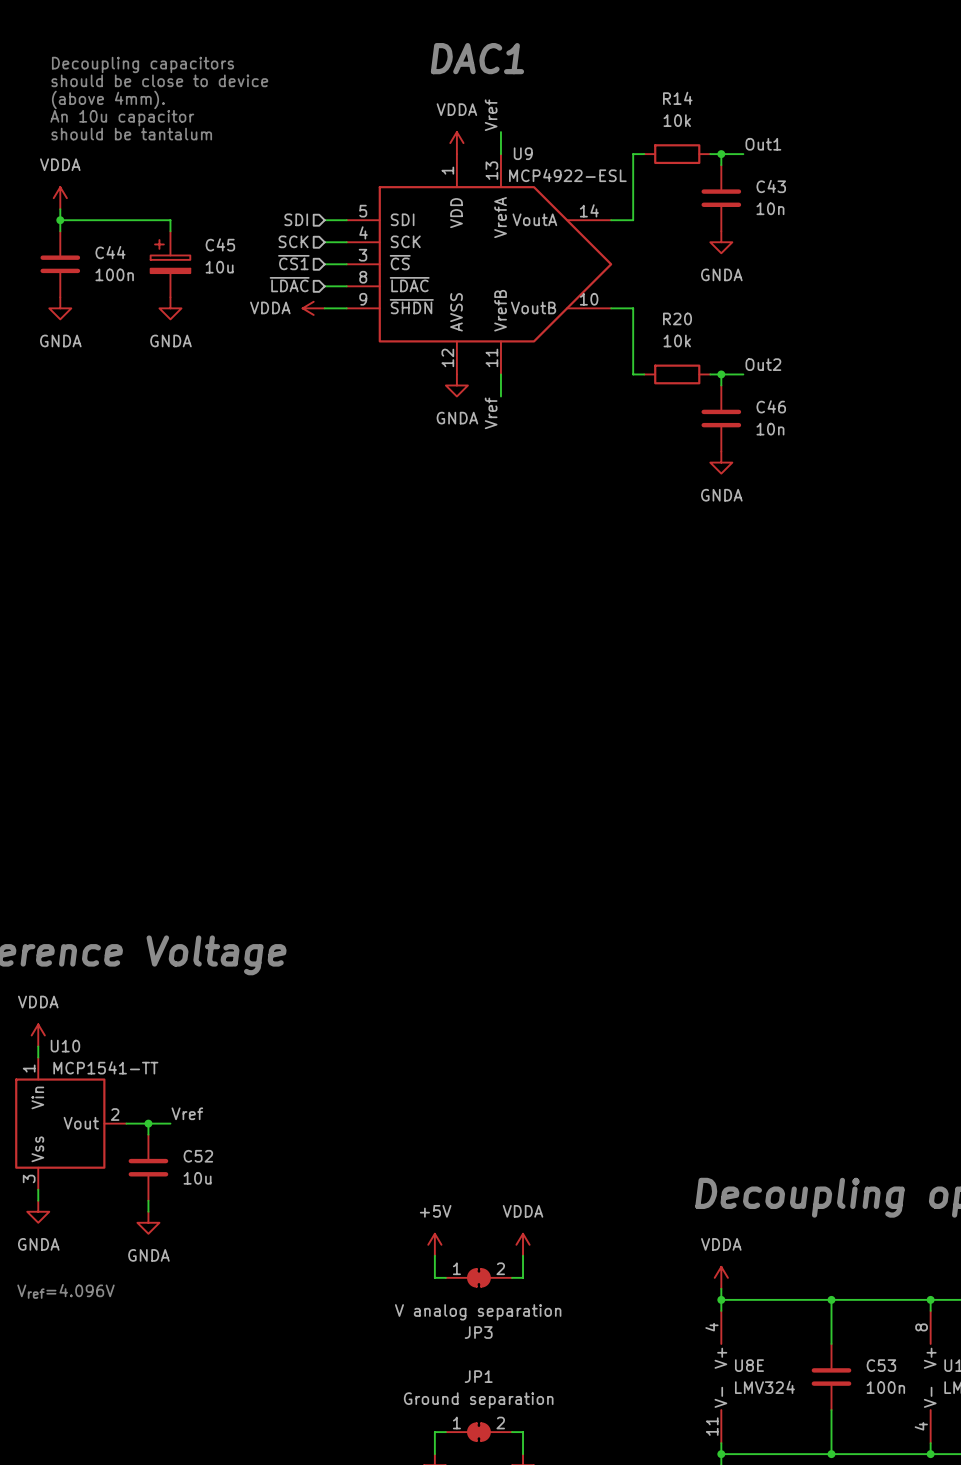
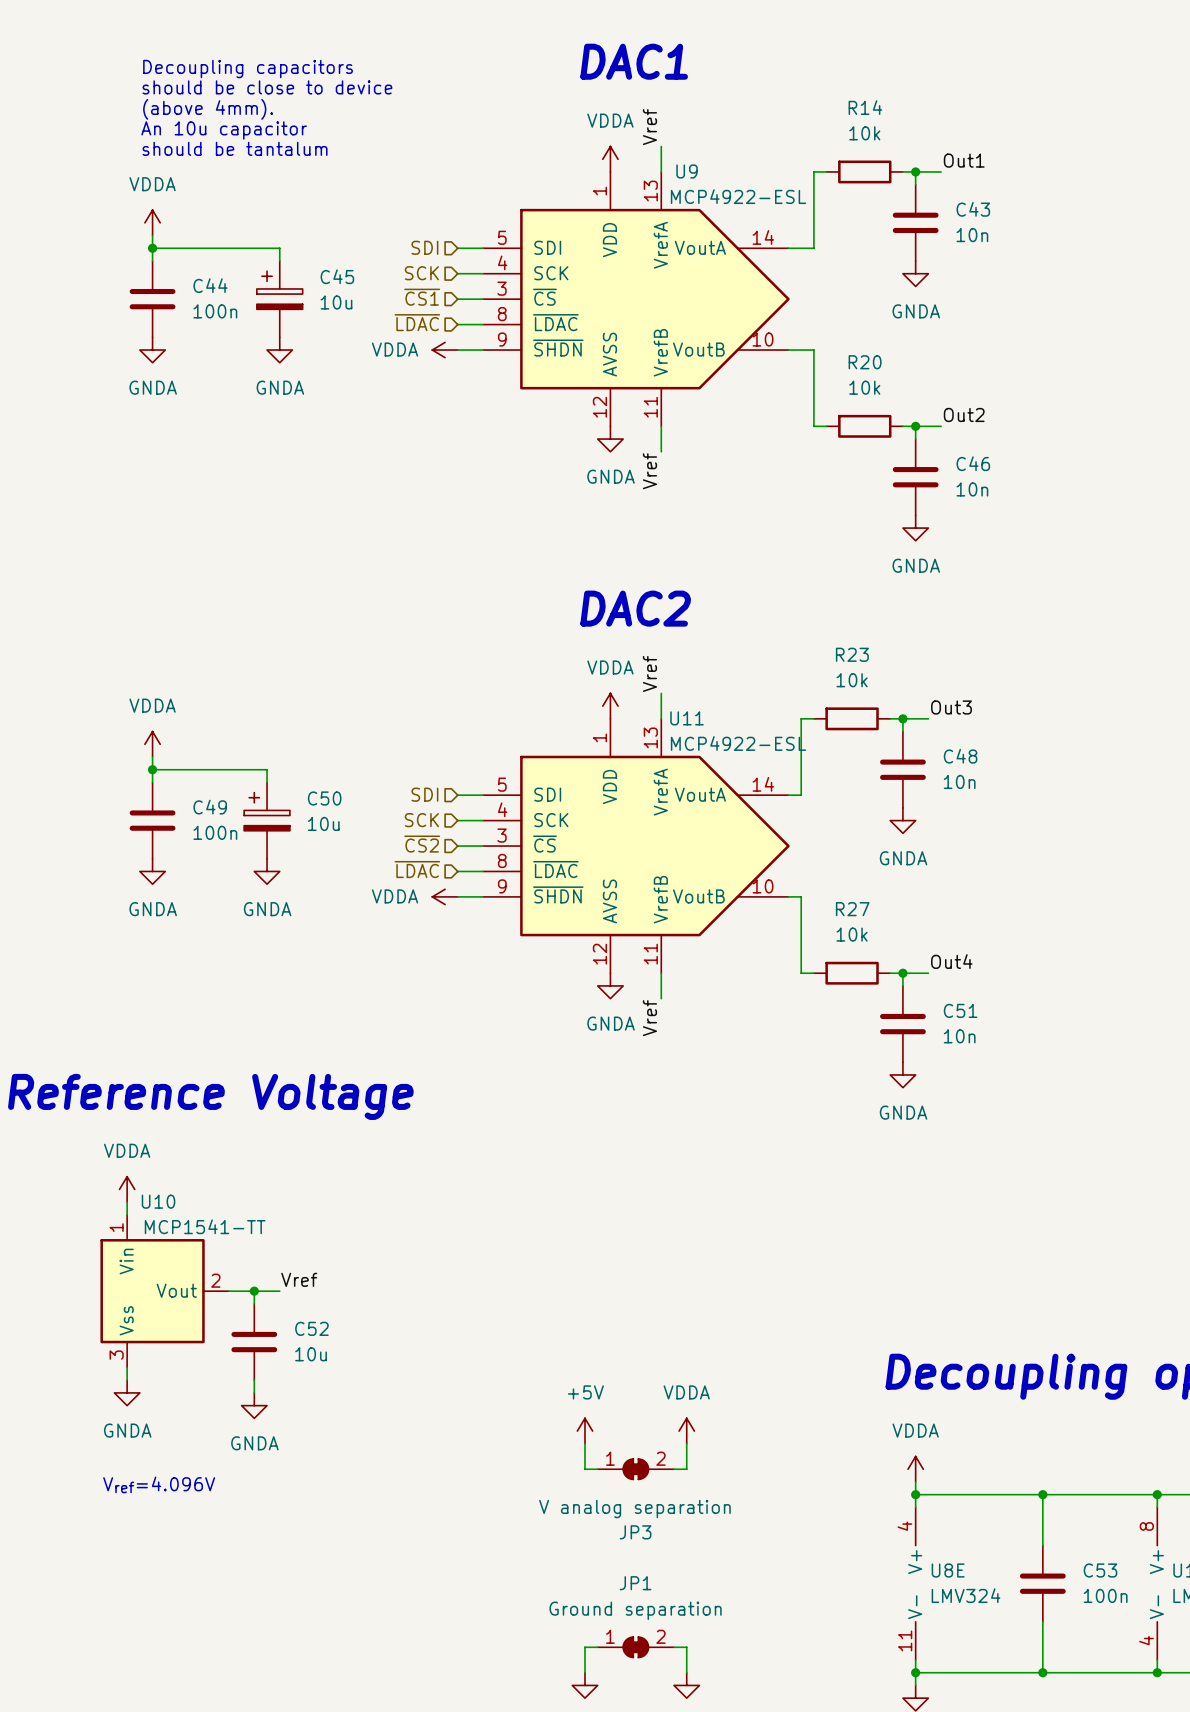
text: none -> DAC2 (635, 608)
label: none -> Vref (649, 673)
wire: none -> (661, 693) (661, 718)
power symbol: none -> VDDA (610, 706)
label: none -> Out3 (951, 707)
wire: none -> (813, 718) (801, 718) (801, 795) (788, 795)
R23: none -> 10k (852, 718)
wire: none -> (890, 718) (928, 718)
wire: none -> (902, 718) (902, 731)
junction: none -> (902, 718)
power symbol: none -> VDDA (152, 744)
wire: none -> (152, 757) (152, 782)
wire: none -> (152, 769) (267, 769) (267, 782)
junction: none -> (152, 769)
C48: none -> 10n (902, 769)
hierarchical label: none -> SDI (424, 794)
wire: none -> (457, 795) (483, 795)
C49: none -> 100n (152, 820)
C50: none -> 10u (267, 820)
hierarchical label: none -> SCK (421, 820)
wire: none -> (457, 820) (483, 820)
power symbol: none -> GNDA (902, 820)
hierarchical label: none -> ~{CS2} (422, 844)
wire: none -> (457, 846) (483, 846)
U11: none -> MCP4922-ESL (636, 846)
hierarchical label: none -> ~{LDAC} (417, 869)
power symbol: none -> GNDA (152, 871)
power symbol: none -> GNDA (267, 871)
wire: none -> (457, 871) (483, 871)
power symbol: none -> VDDA (445, 896)
wire: none -> (457, 896) (483, 896)
wire: none -> (788, 896) (801, 896) (801, 973) (813, 973)
label: none -> Out4 (951, 961)
wire: none -> (661, 973) (661, 998)
R27: none -> 10k (852, 973)
wire: none -> (890, 973) (928, 973)
wire: none -> (902, 973) (902, 985)
junction: none -> (902, 973)
power symbol: none -> GNDA (610, 985)
label: none -> Vref (649, 1018)
C51: none -> 10n (902, 1024)
power symbol: none -> GNDA (902, 1074)

